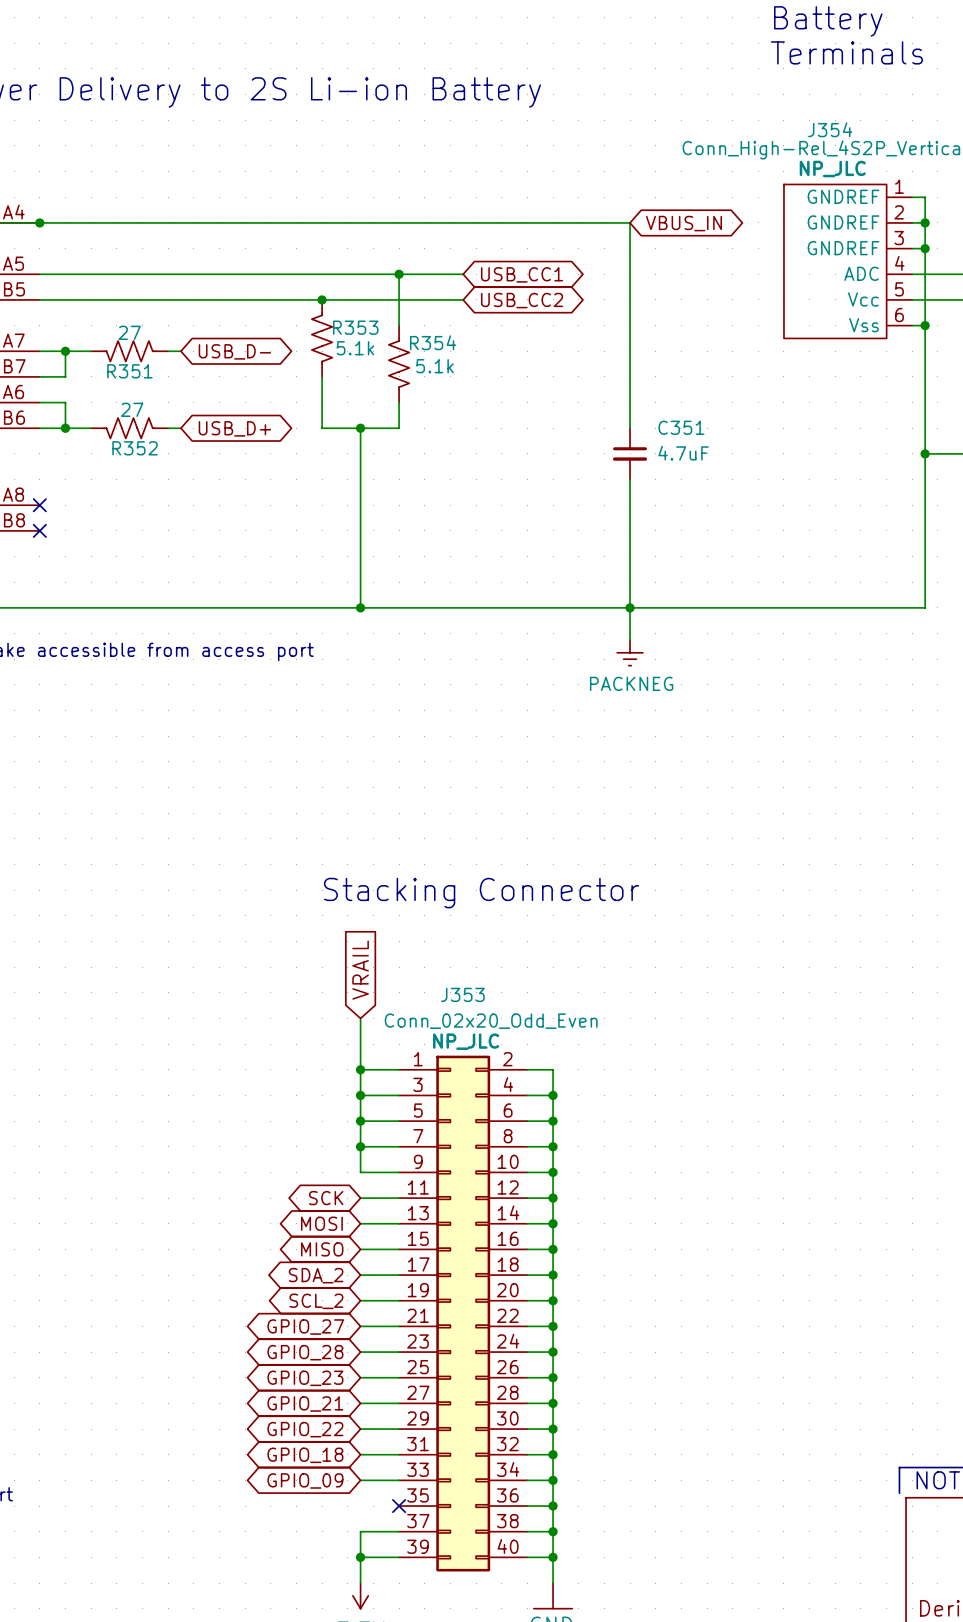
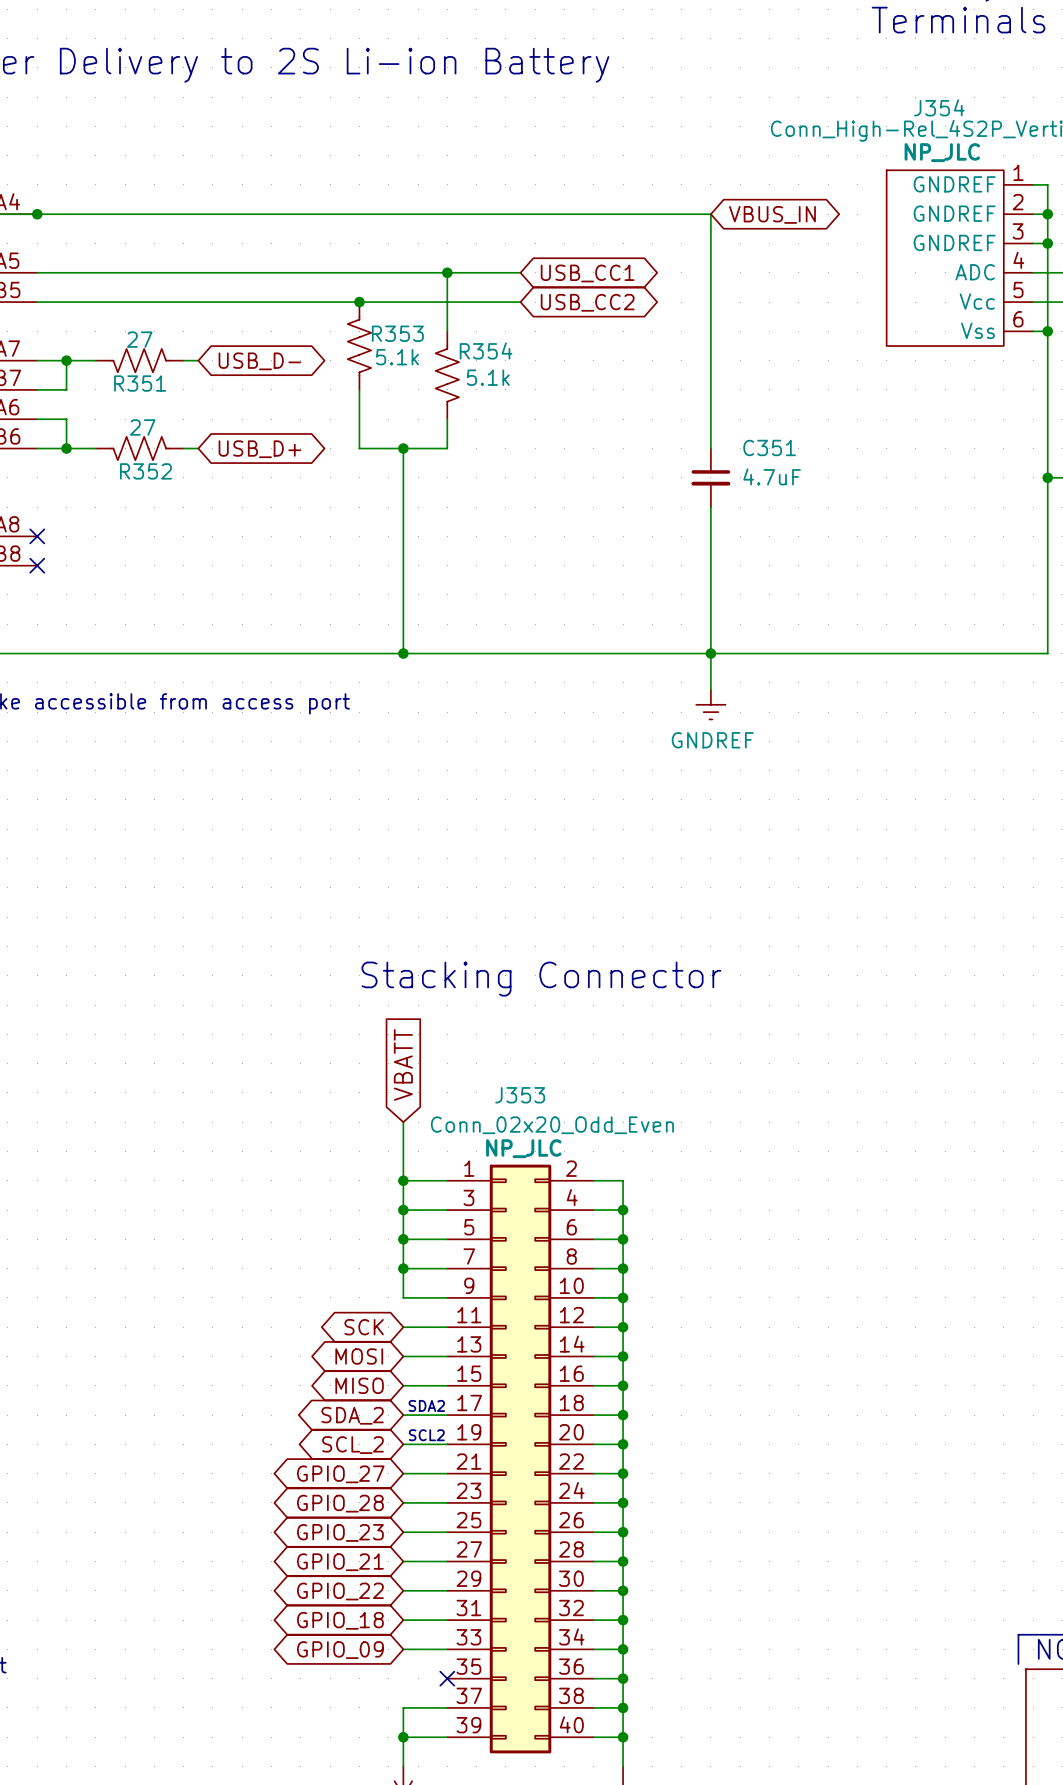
power symbol: PACKNEG (630, 652) -> GNDREF (710, 704)
global label: VRAIL (360, 970) -> VBATT (403, 1064)
text: none -> SDA2 (426, 1405)
text: none -> SCL2 (426, 1435)

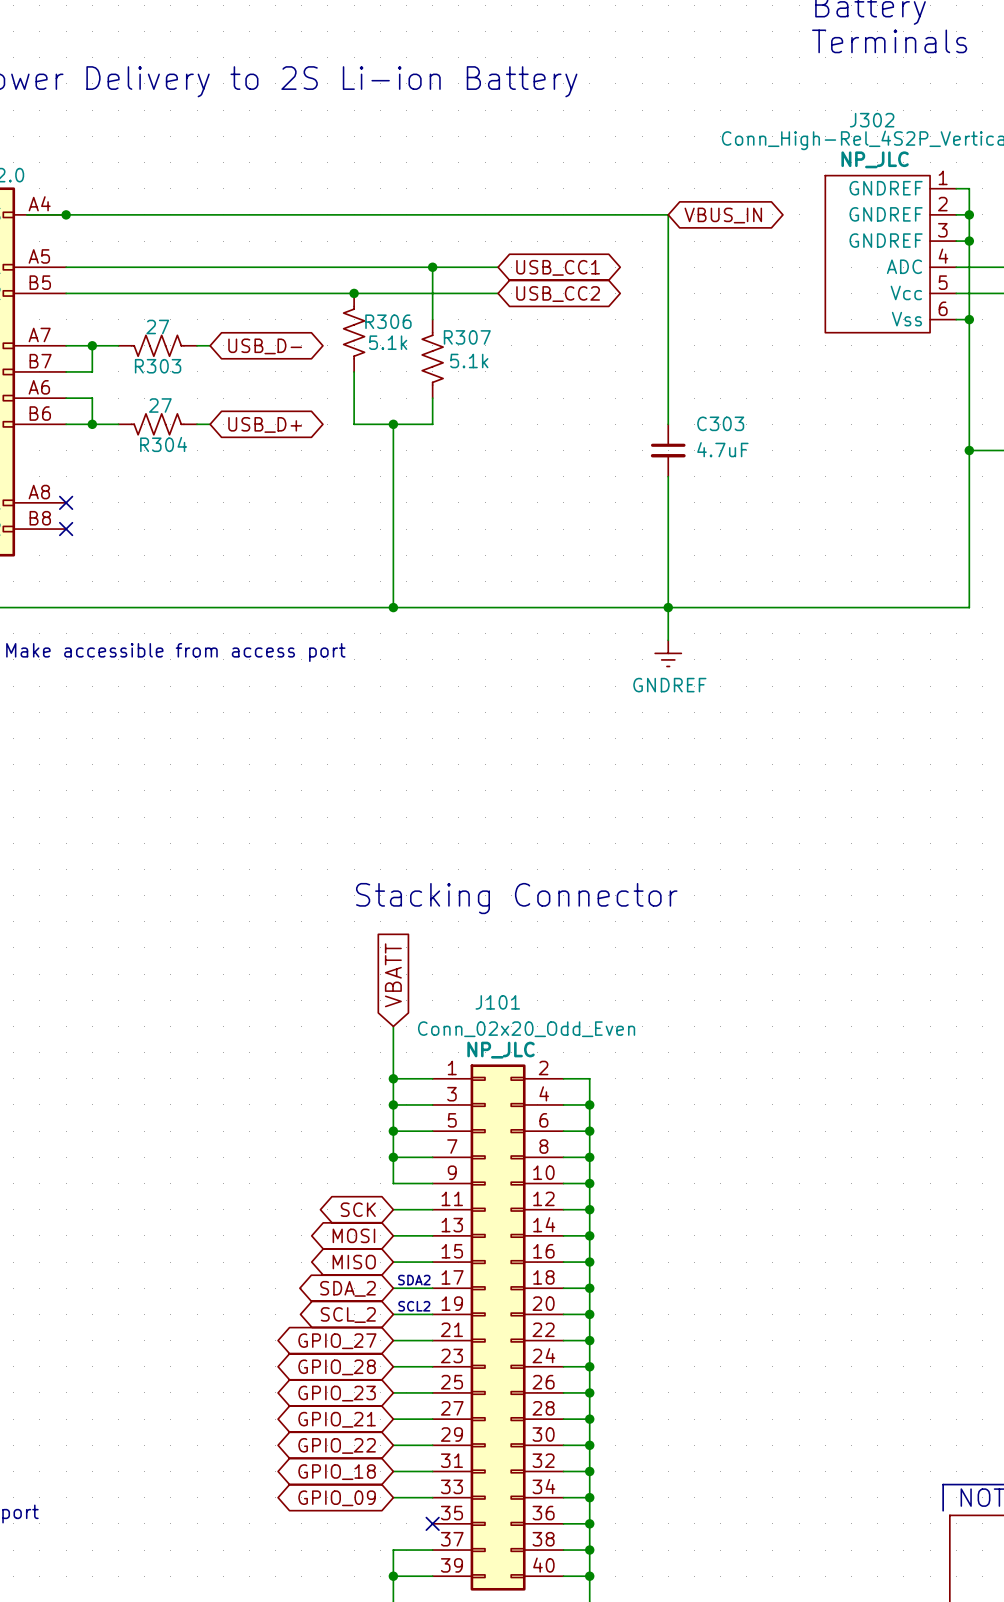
J354 name: J354 (939, 107) -> J302 (872, 120)
R353 name: R353 (397, 333) -> R306 (388, 321)
R354 name: R354 (486, 350) -> R307 (467, 337)
R351 name: R351 (140, 383) -> R303 (158, 366)
C351 name: C351 (769, 447) -> C303 (720, 423)
R352 name: R352 (145, 471) -> R304 (163, 444)
J353 name: J353 (520, 1095) -> J101 (497, 1002)

